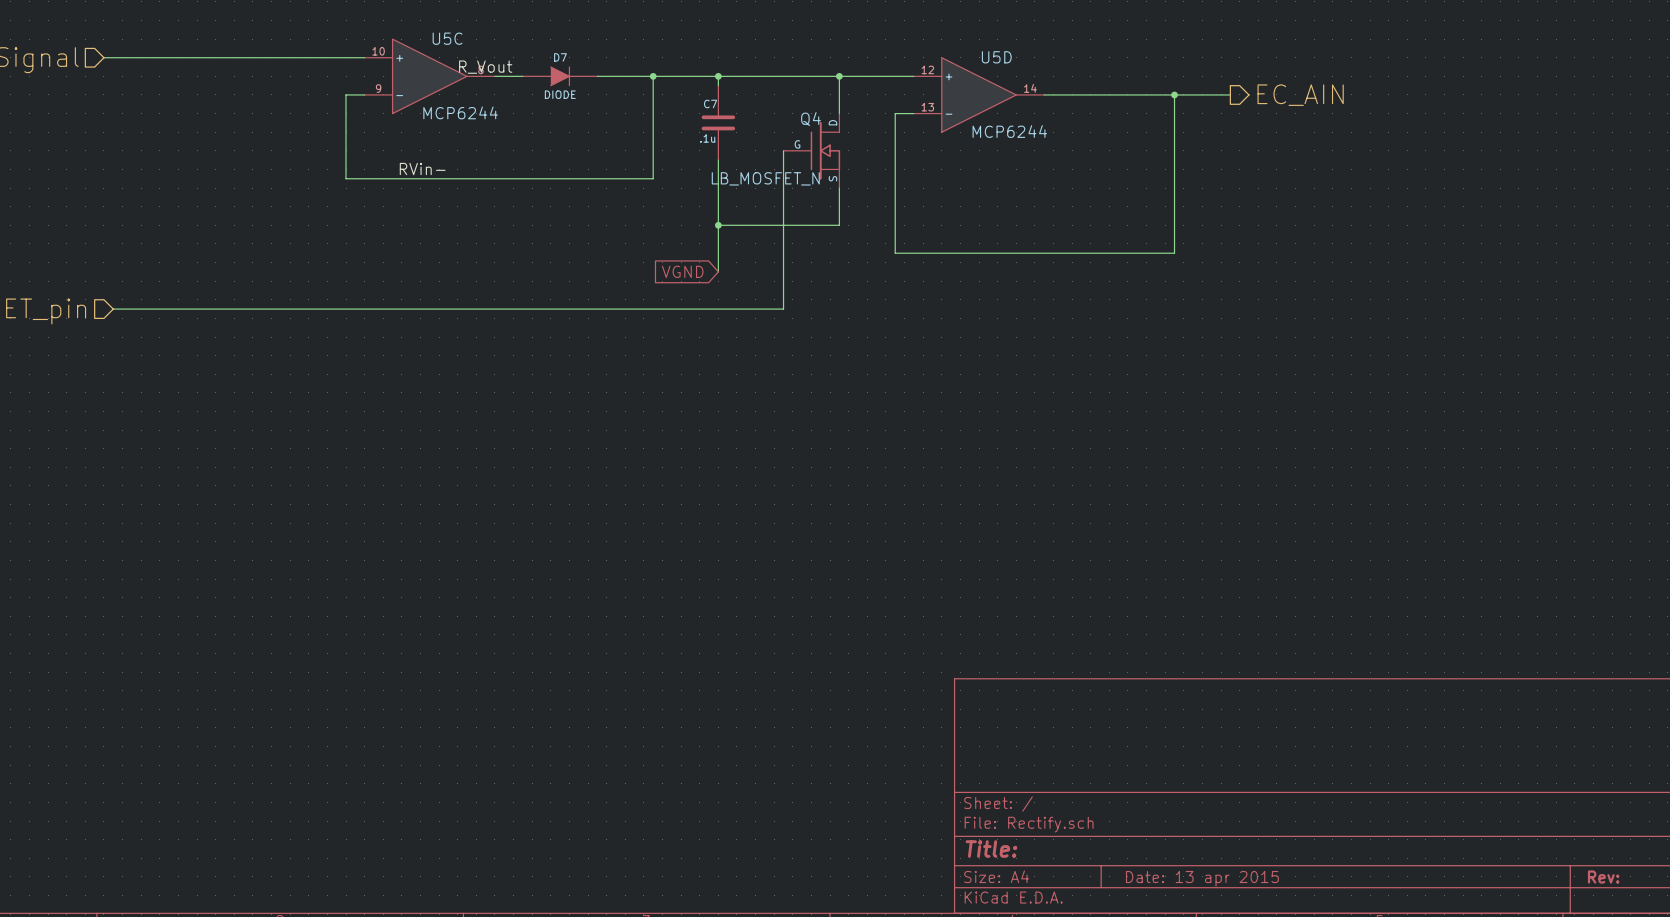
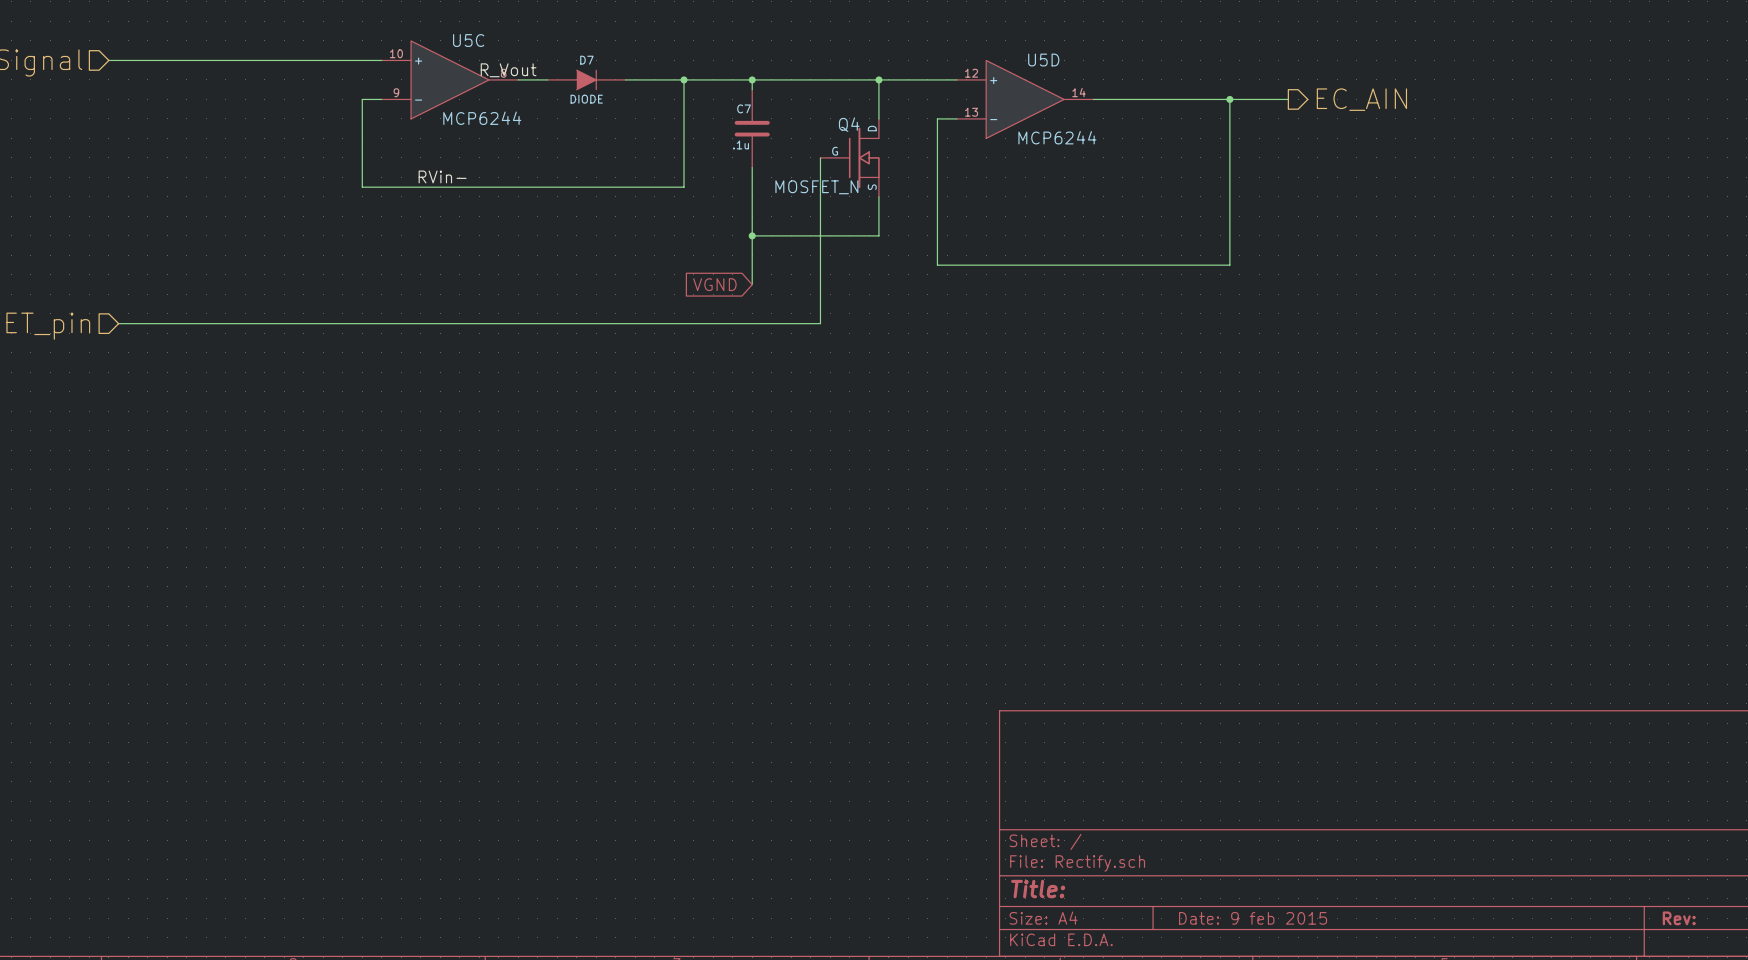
Q4 value: LB_MOSFET_N (765, 178) -> MOSFET_N (816, 187)
title block: Date: 13 apr 2015 (1202, 878) -> Date: 9 feb 2015 (1253, 918)

